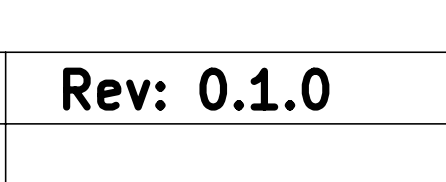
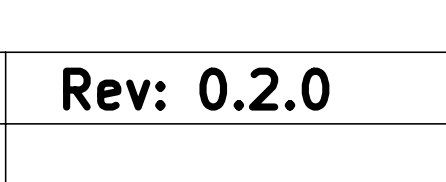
title block: Rev: 0.1.0 (196, 89) -> Rev: 0.2.0 (196, 89)

